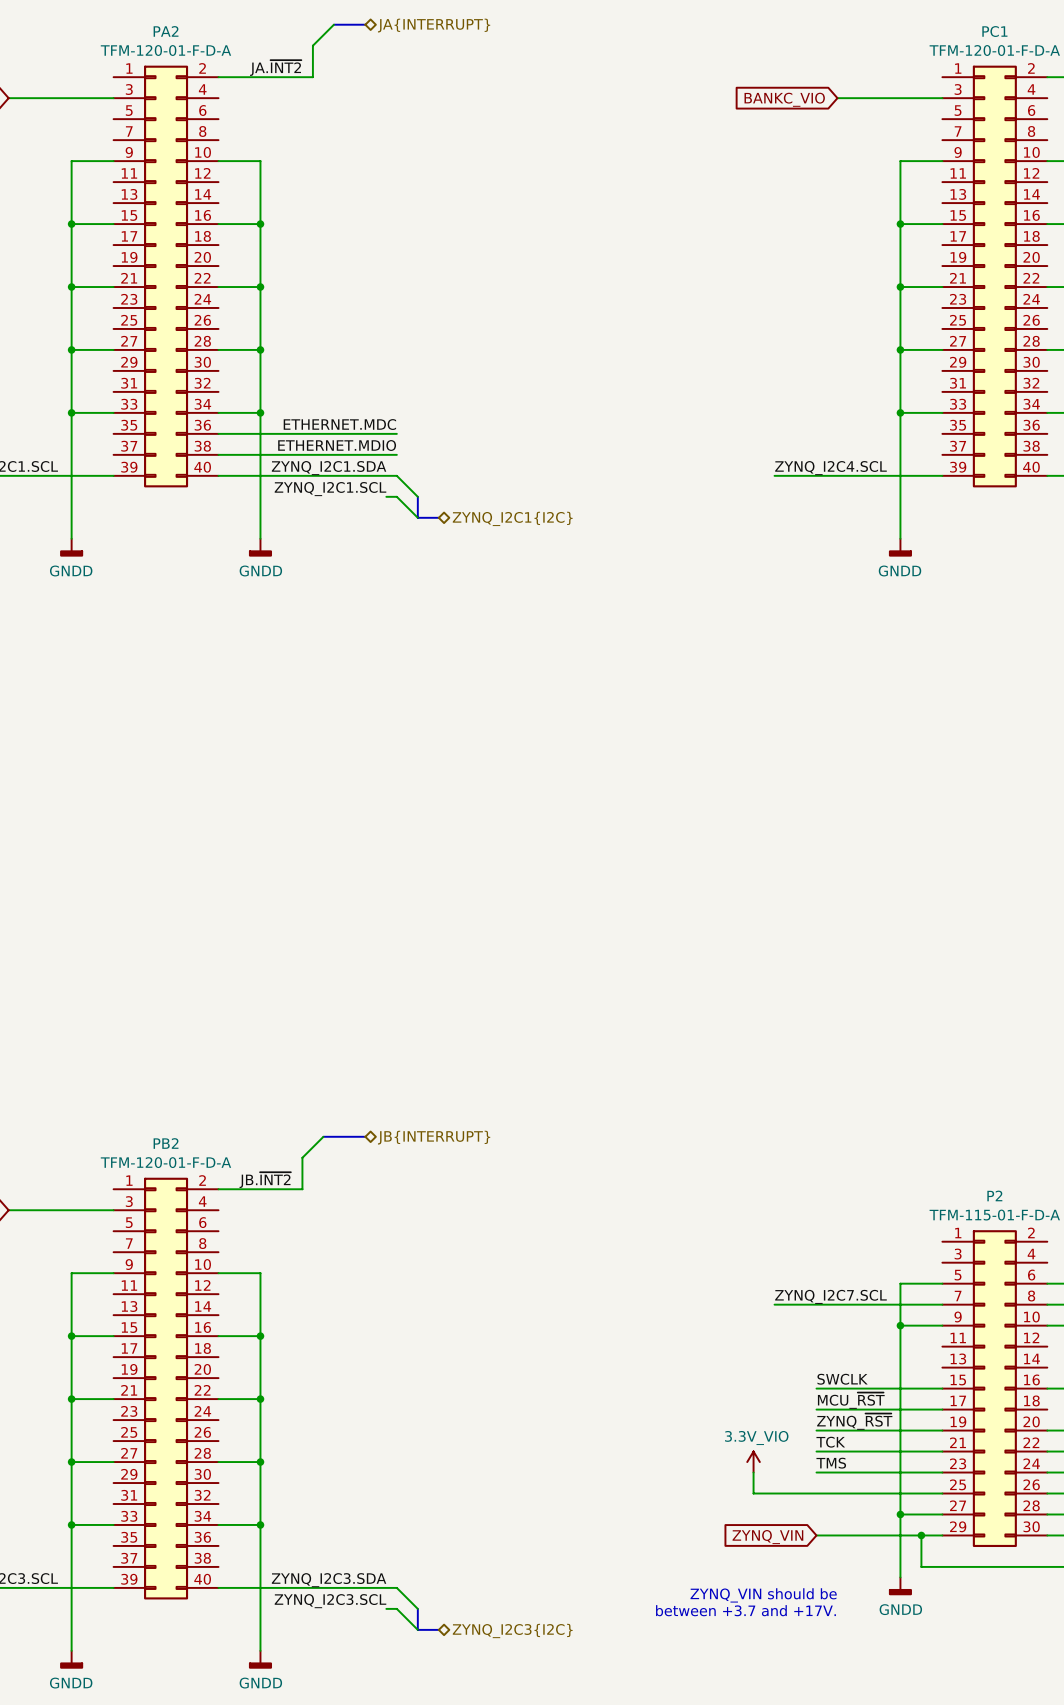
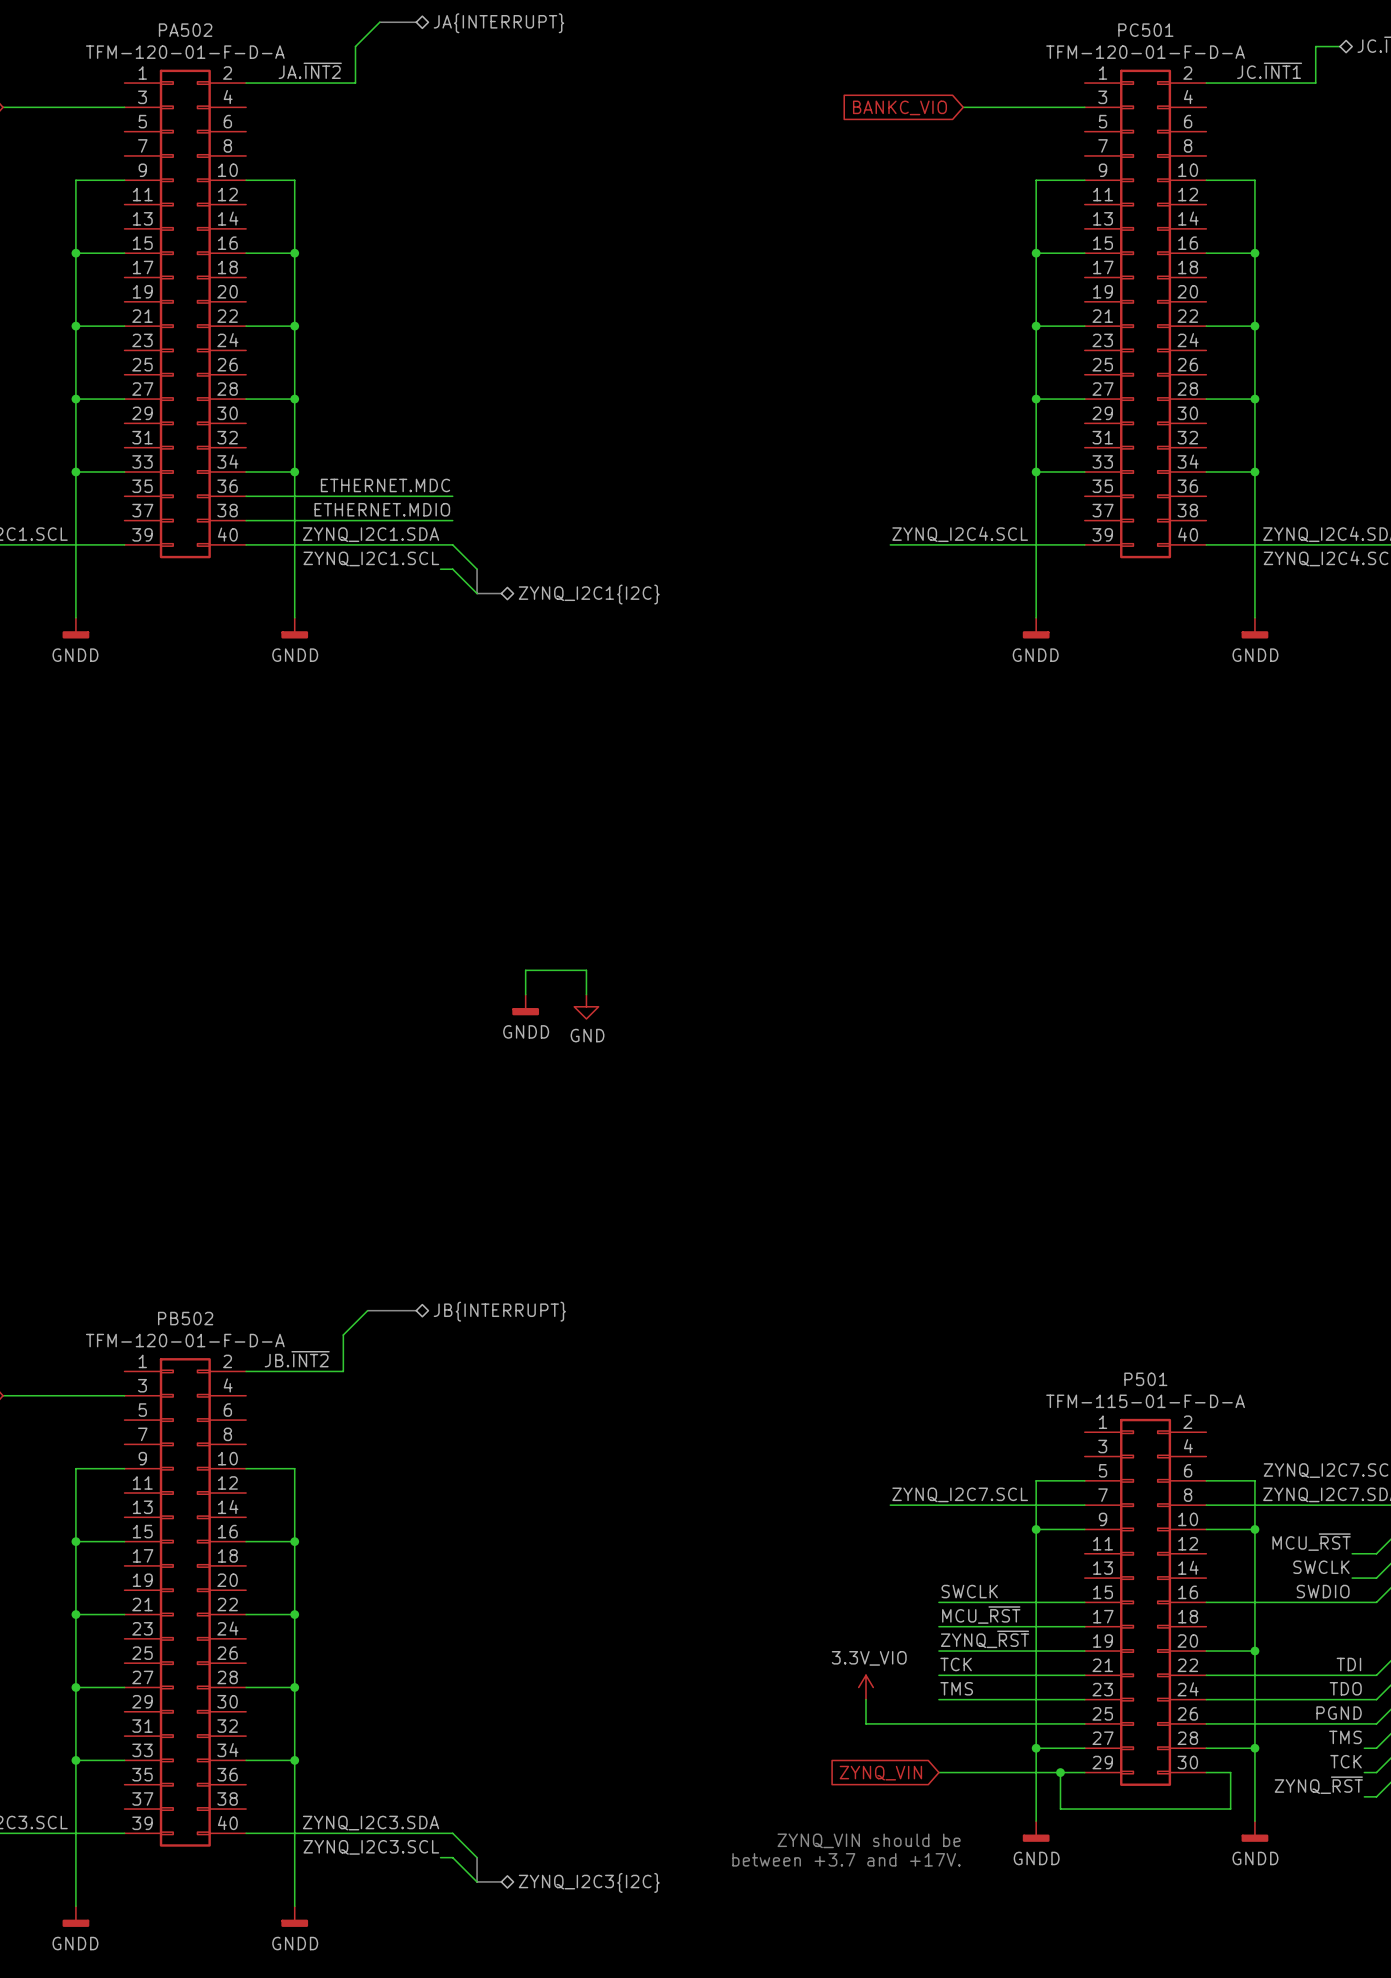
PA2 name: PA2 (166, 31) -> PA502 (185, 30)
PC1 name: PC1 (994, 31) -> PC501 (1145, 30)
wire: none -> (525, 994) (525, 970) (586, 970) (586, 994)
power symbol: none -> GNDD (525, 1004)
power symbol: none -> GND (586, 1006)
PB2 name: PB2 (166, 1143) -> PB502 (185, 1318)
P2 name: P2 (994, 1195) -> P501 (1145, 1379)

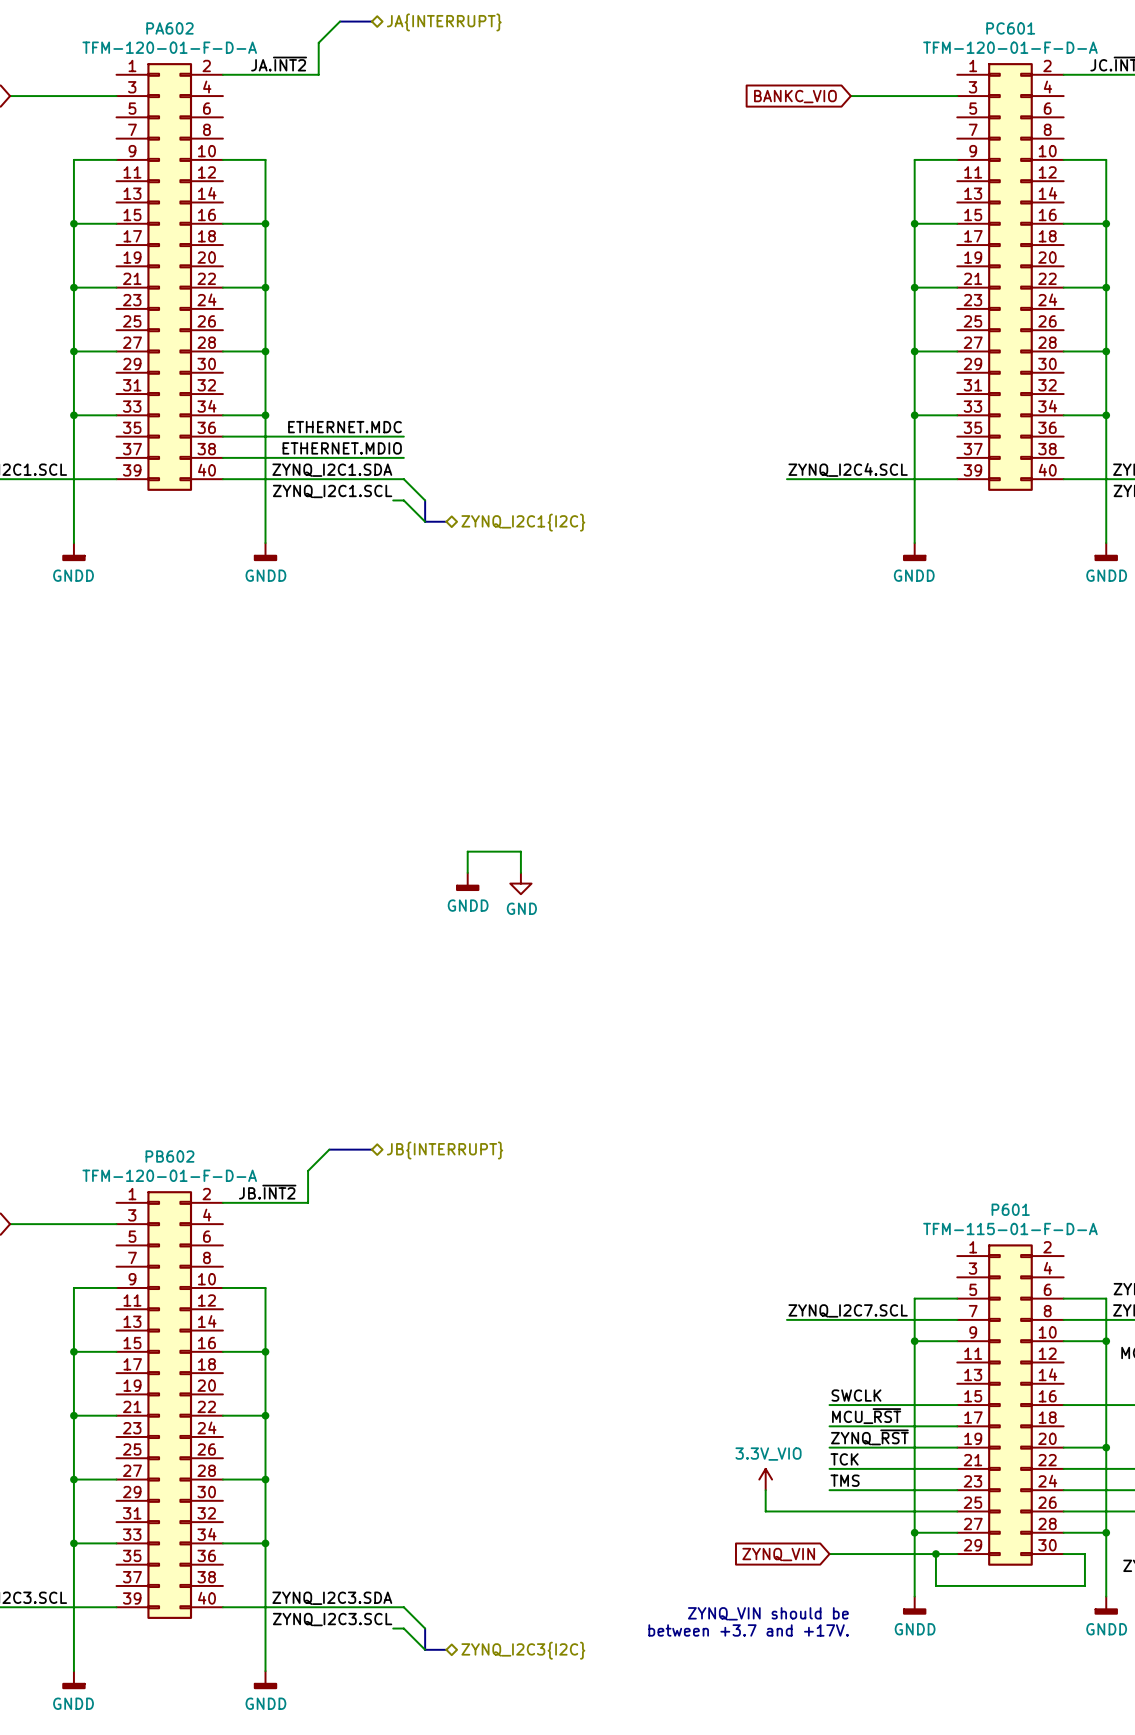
PA502 name: PA502 (185, 30) -> PA602 (169, 28)
PC501 name: PC501 (1145, 30) -> PC601 (1010, 28)
PB502 name: PB502 (185, 1318) -> PB602 (169, 1156)
P501 name: P501 (1145, 1379) -> P601 (1010, 1209)

